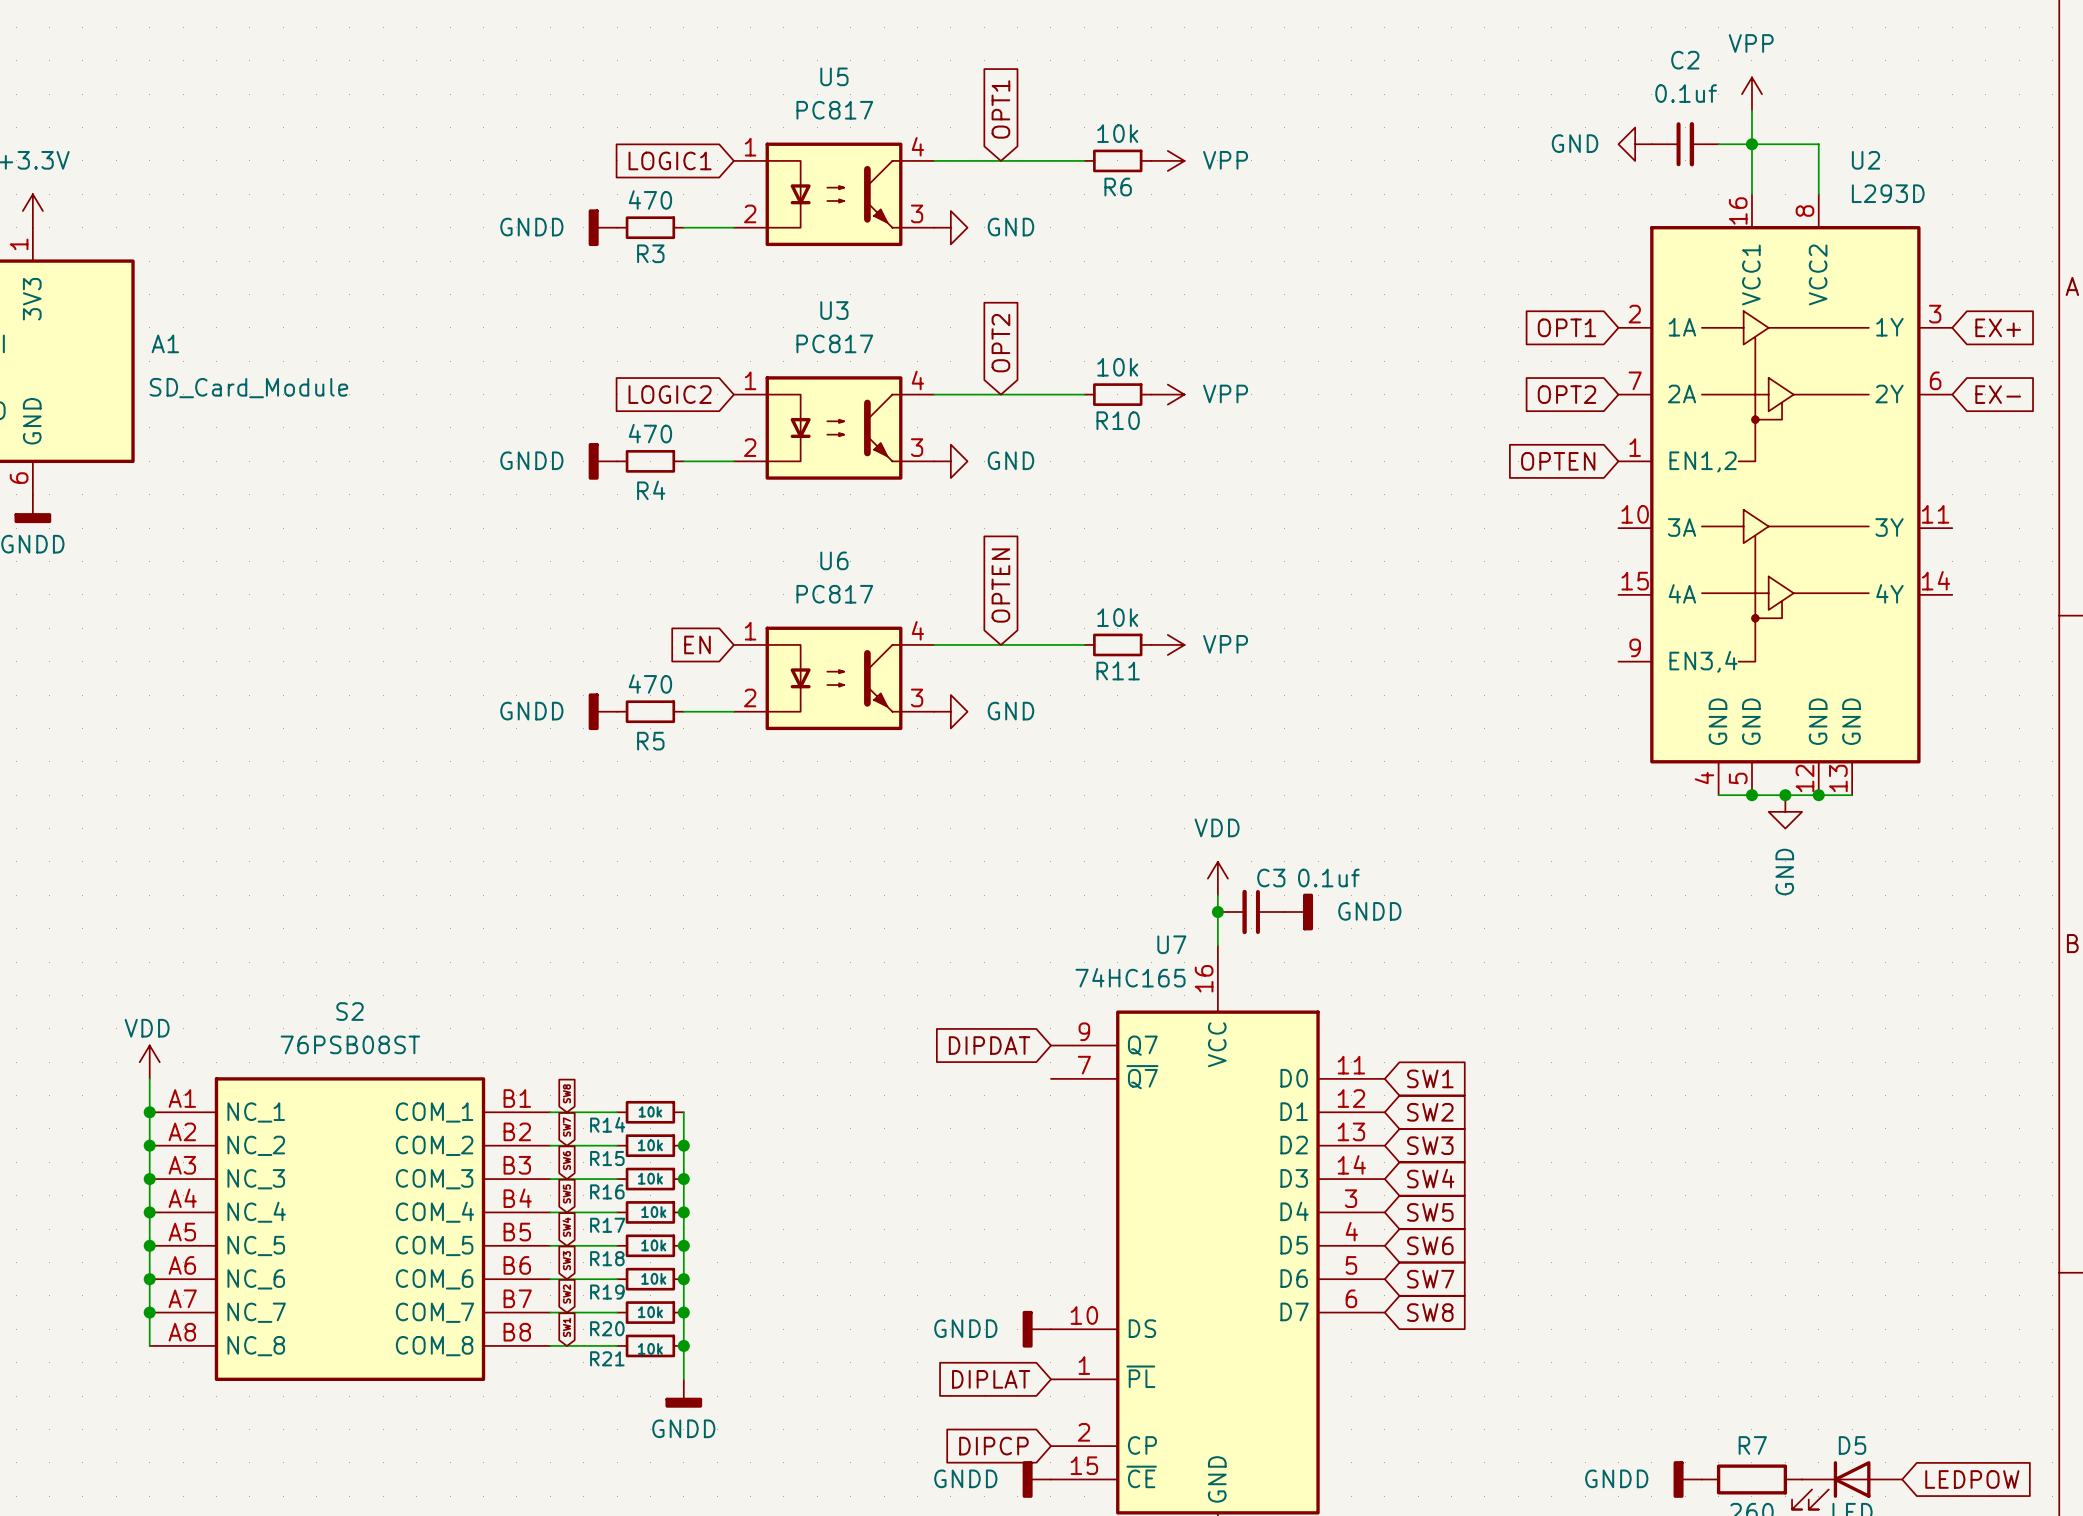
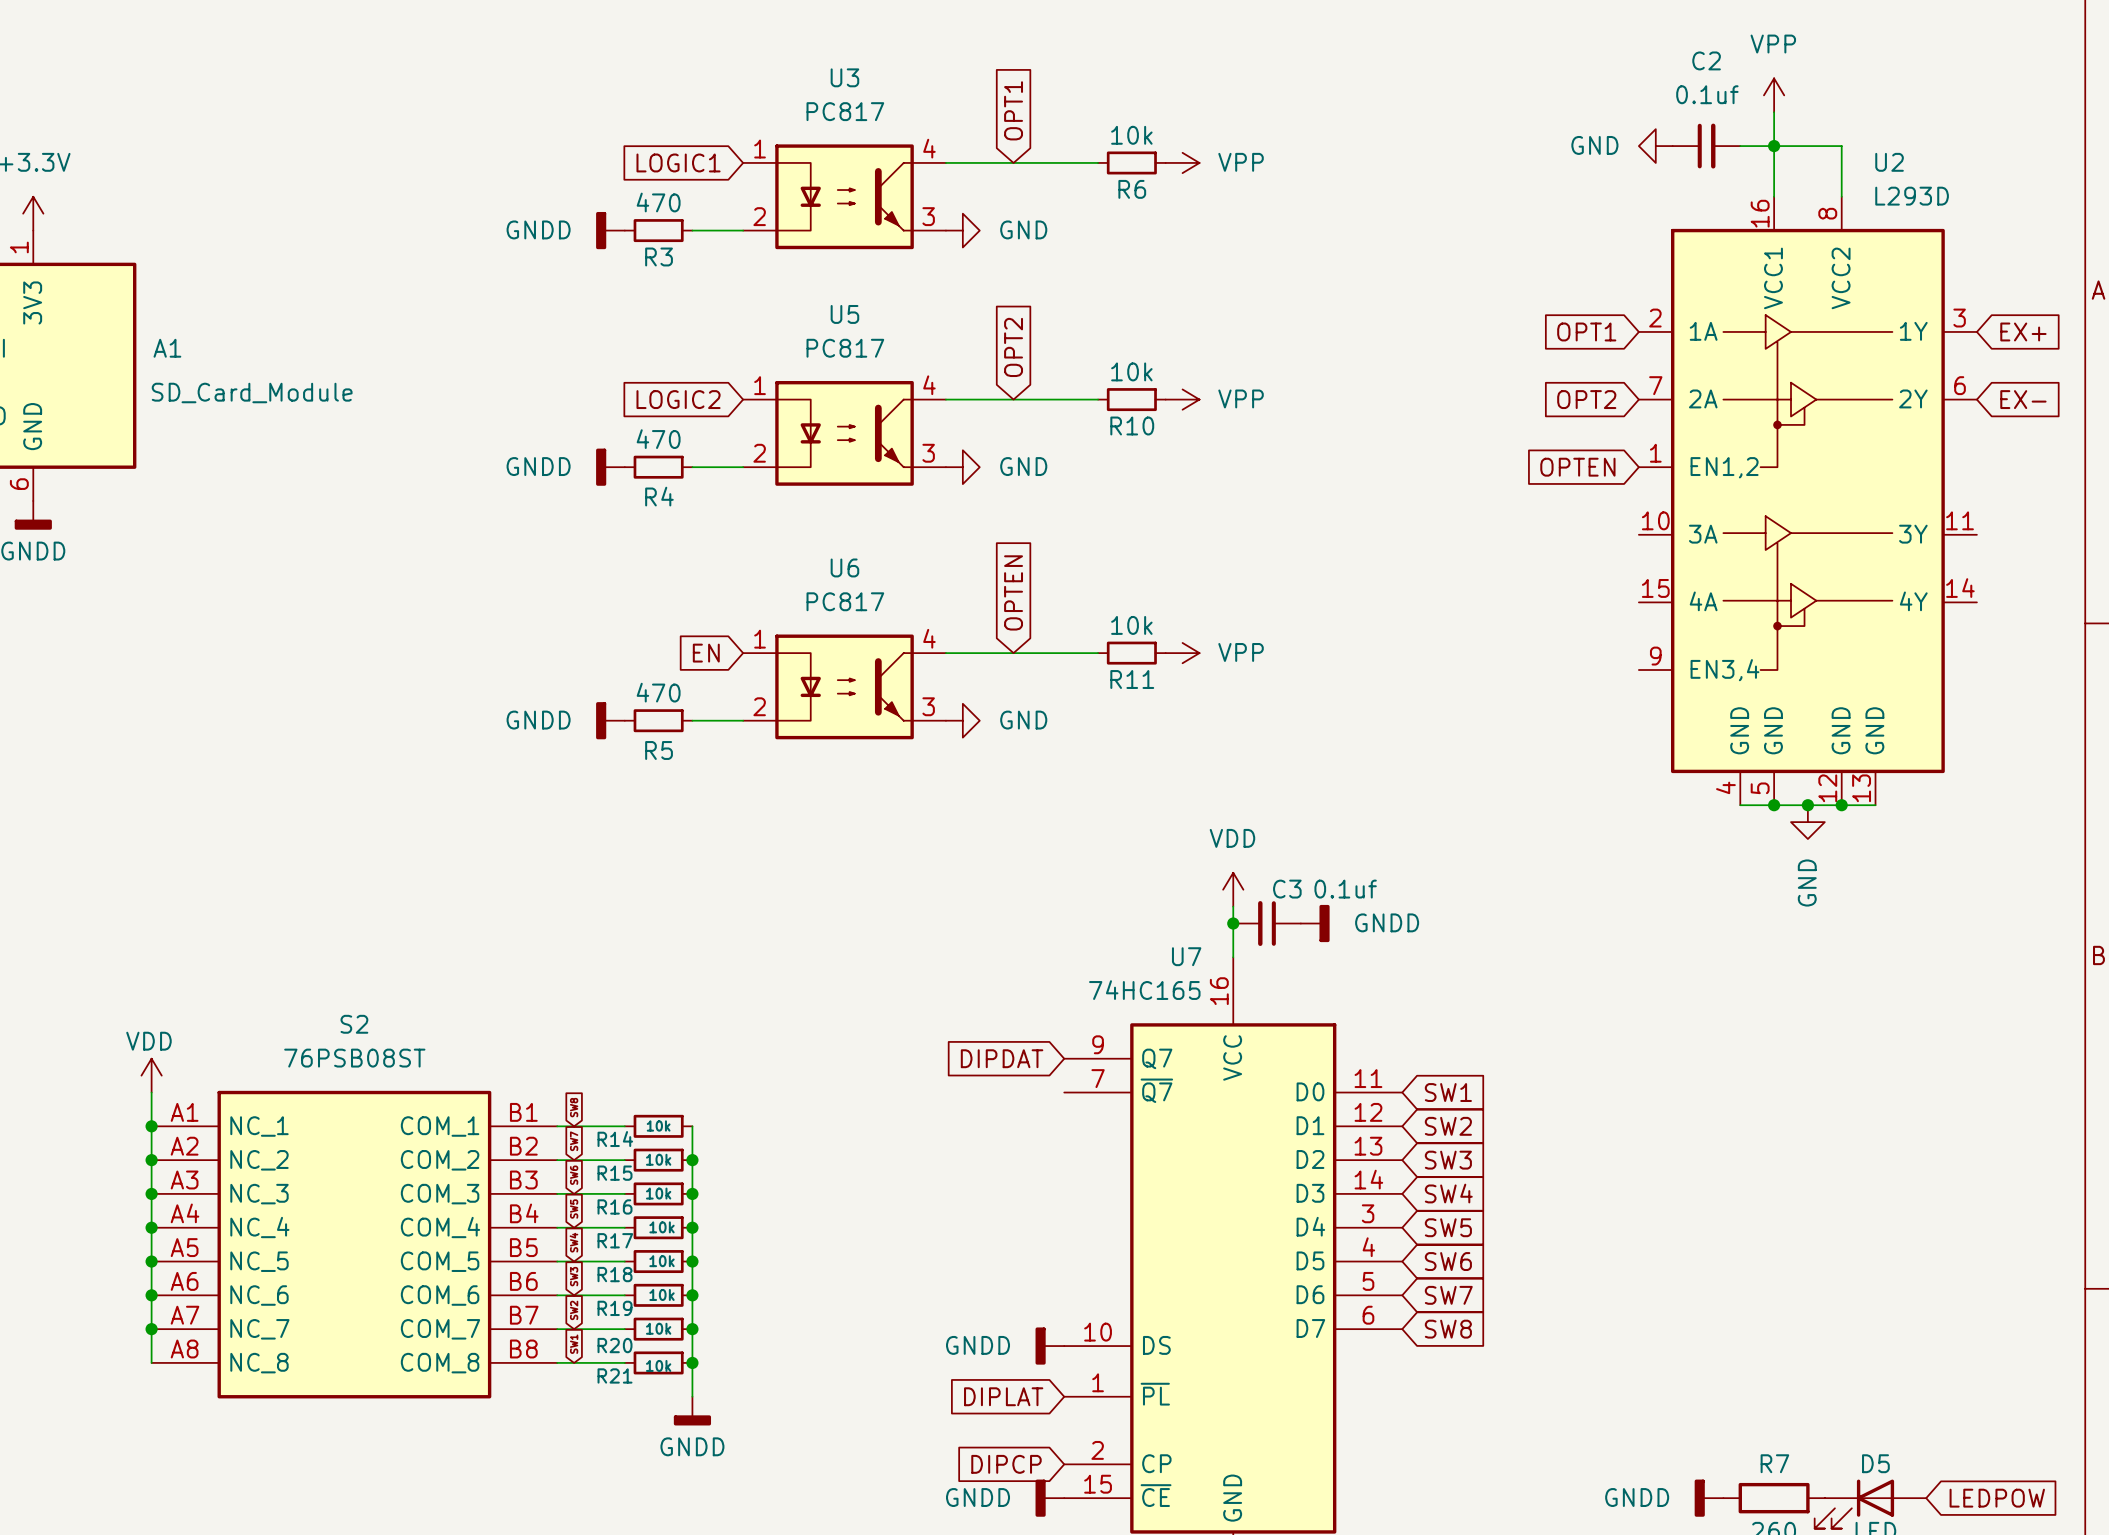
U5 name: U5 (834, 76) -> U3 (844, 77)
U3 name: U3 (834, 310) -> U5 (844, 314)

